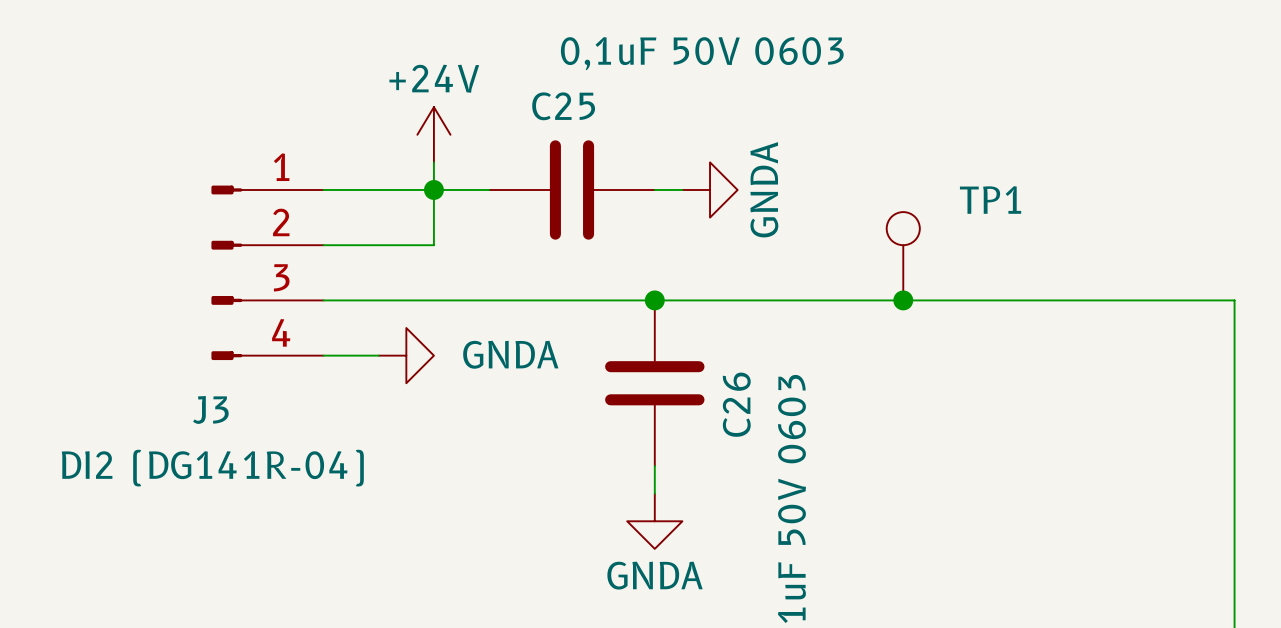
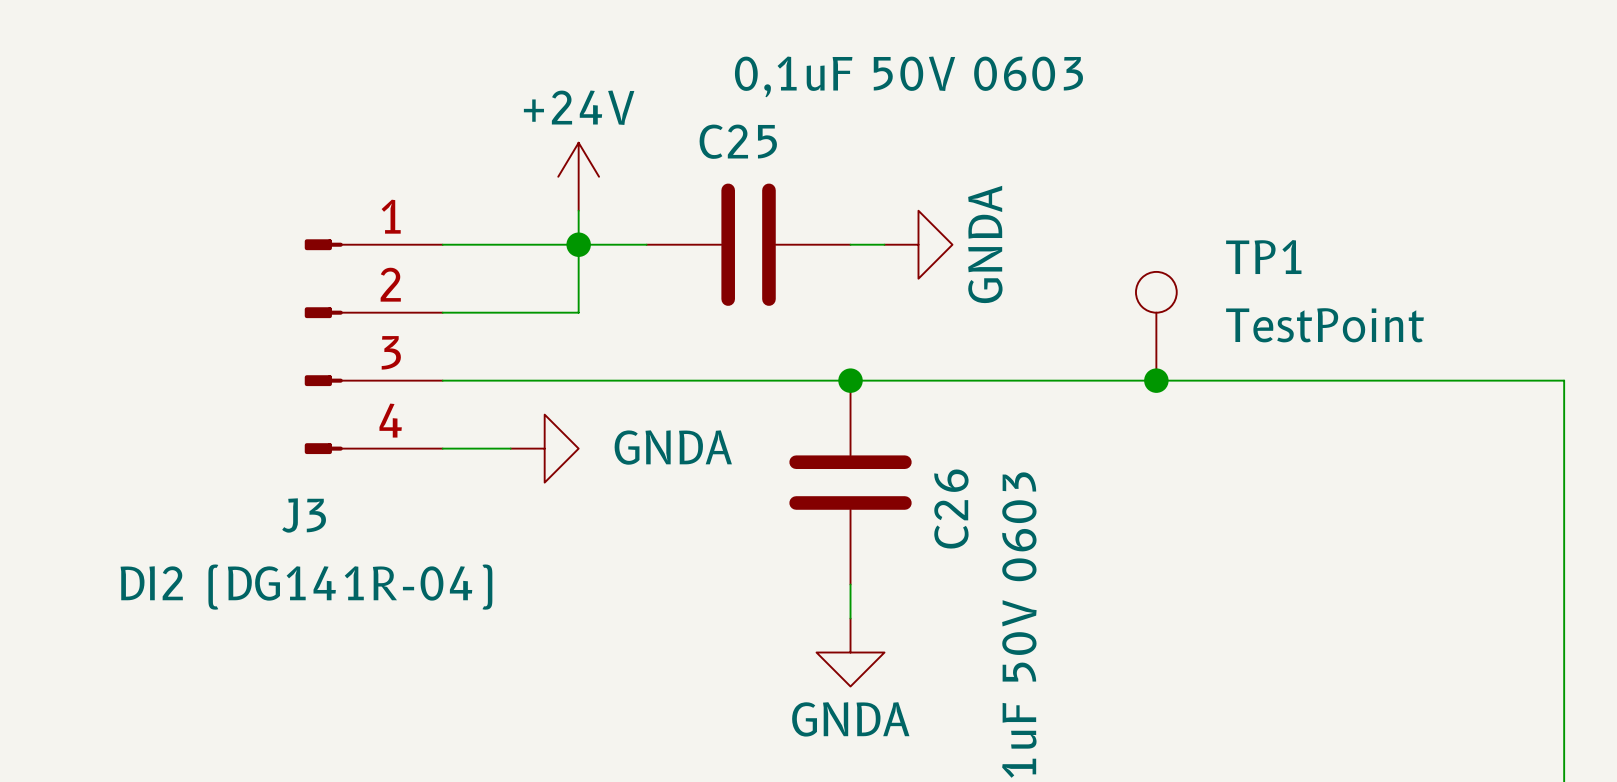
TP1 value: none -> TestPoint (1324, 325)

